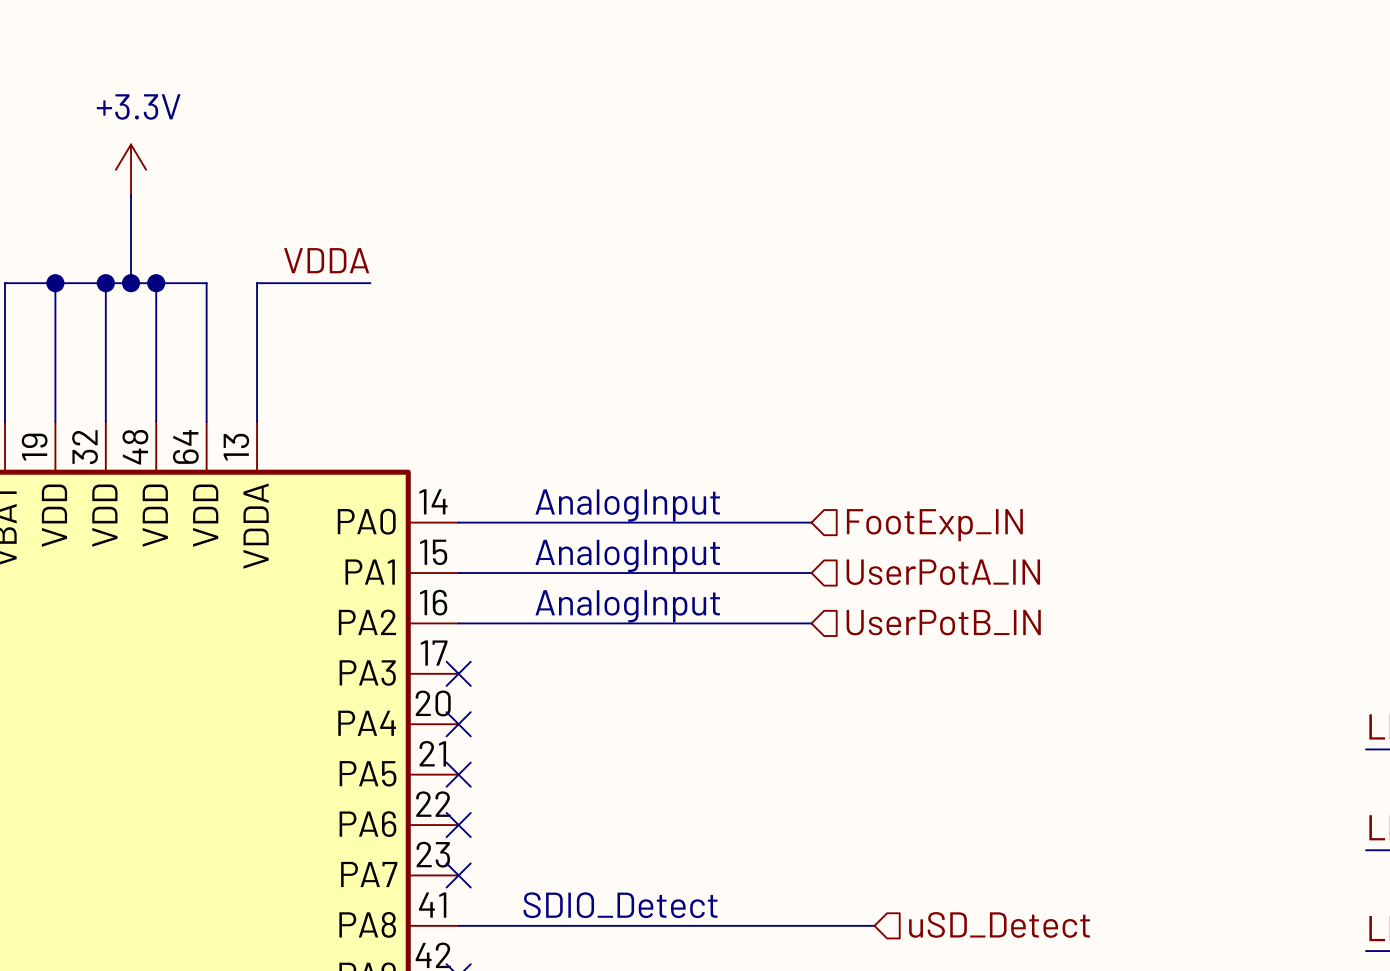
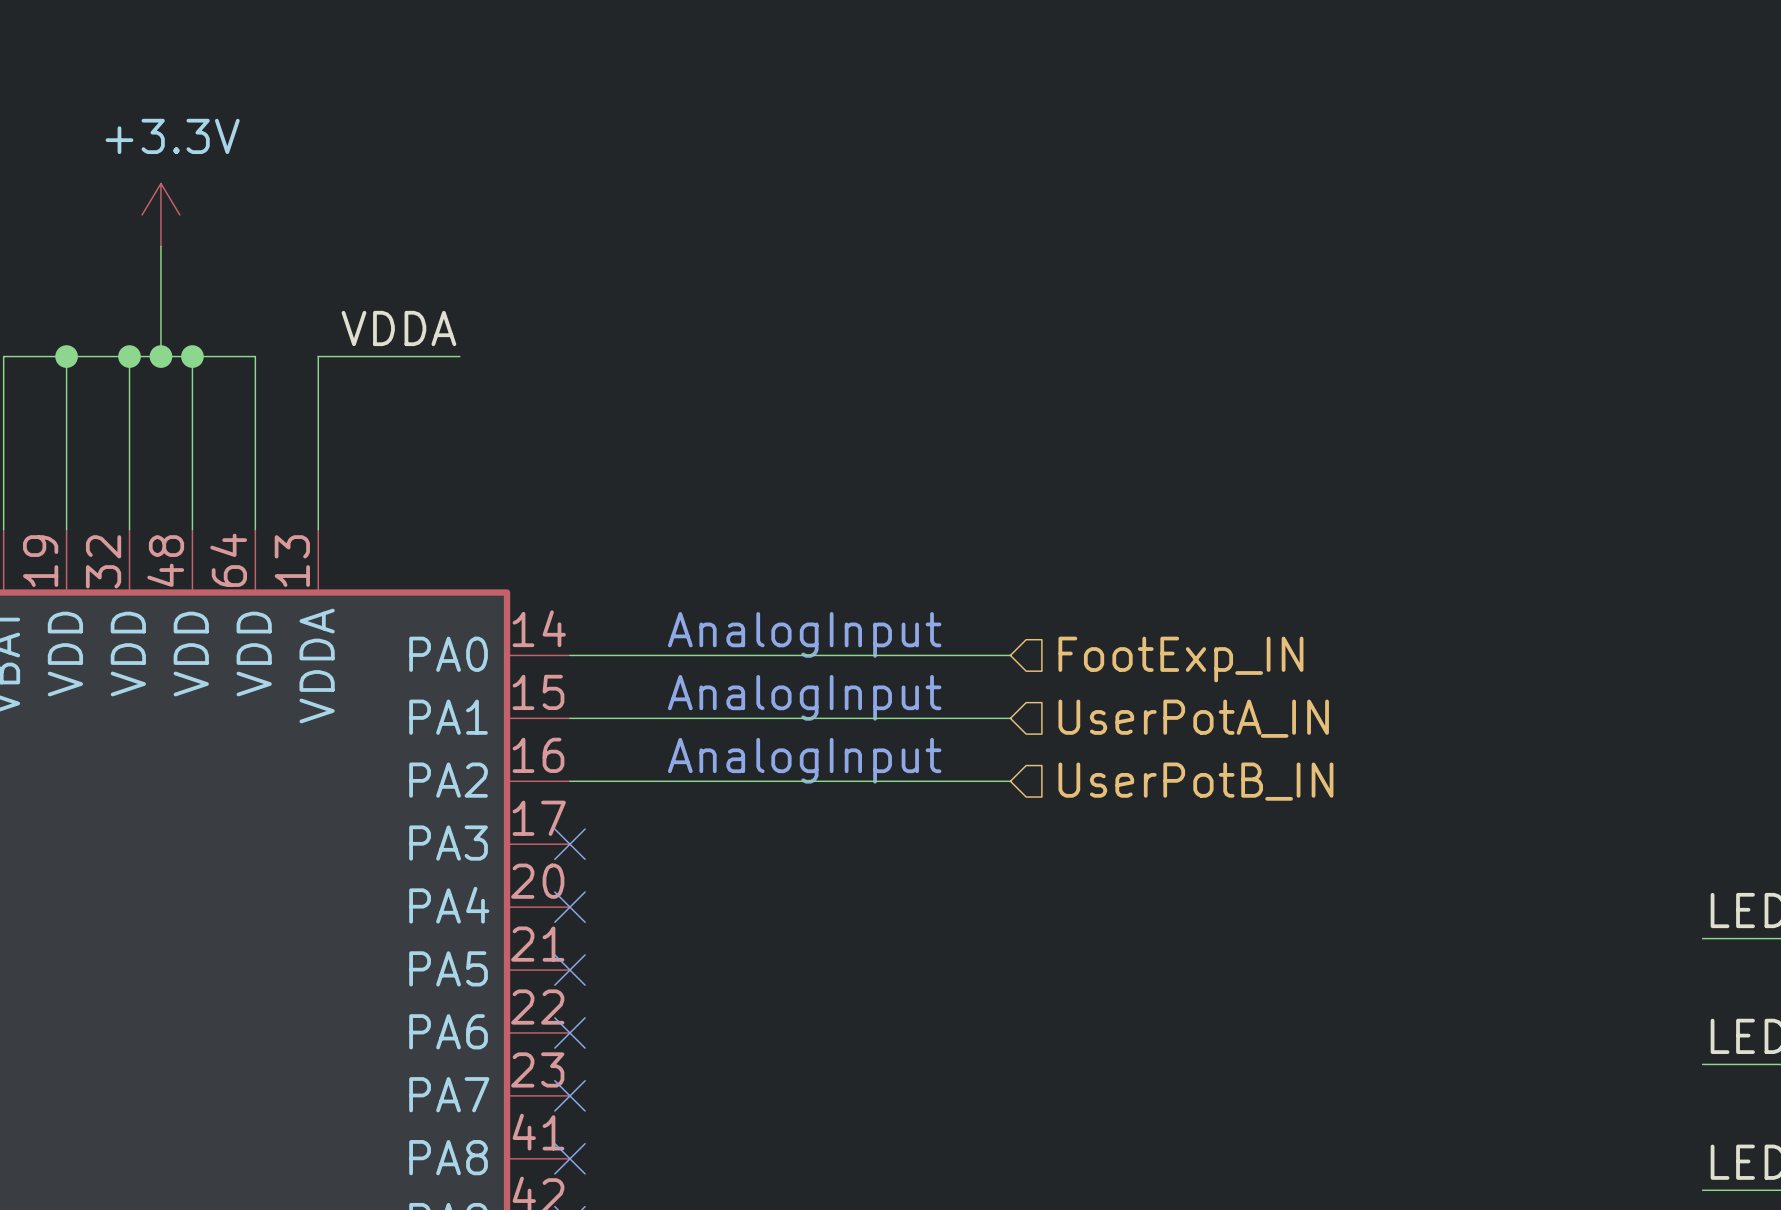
text: SDIO_Detect (620, 905) -> none
hierarchical label: uSD_Detect (999, 924) -> none
wire: (458, 925) (874, 925) -> none
no-connect mark: none -> (569, 1158)

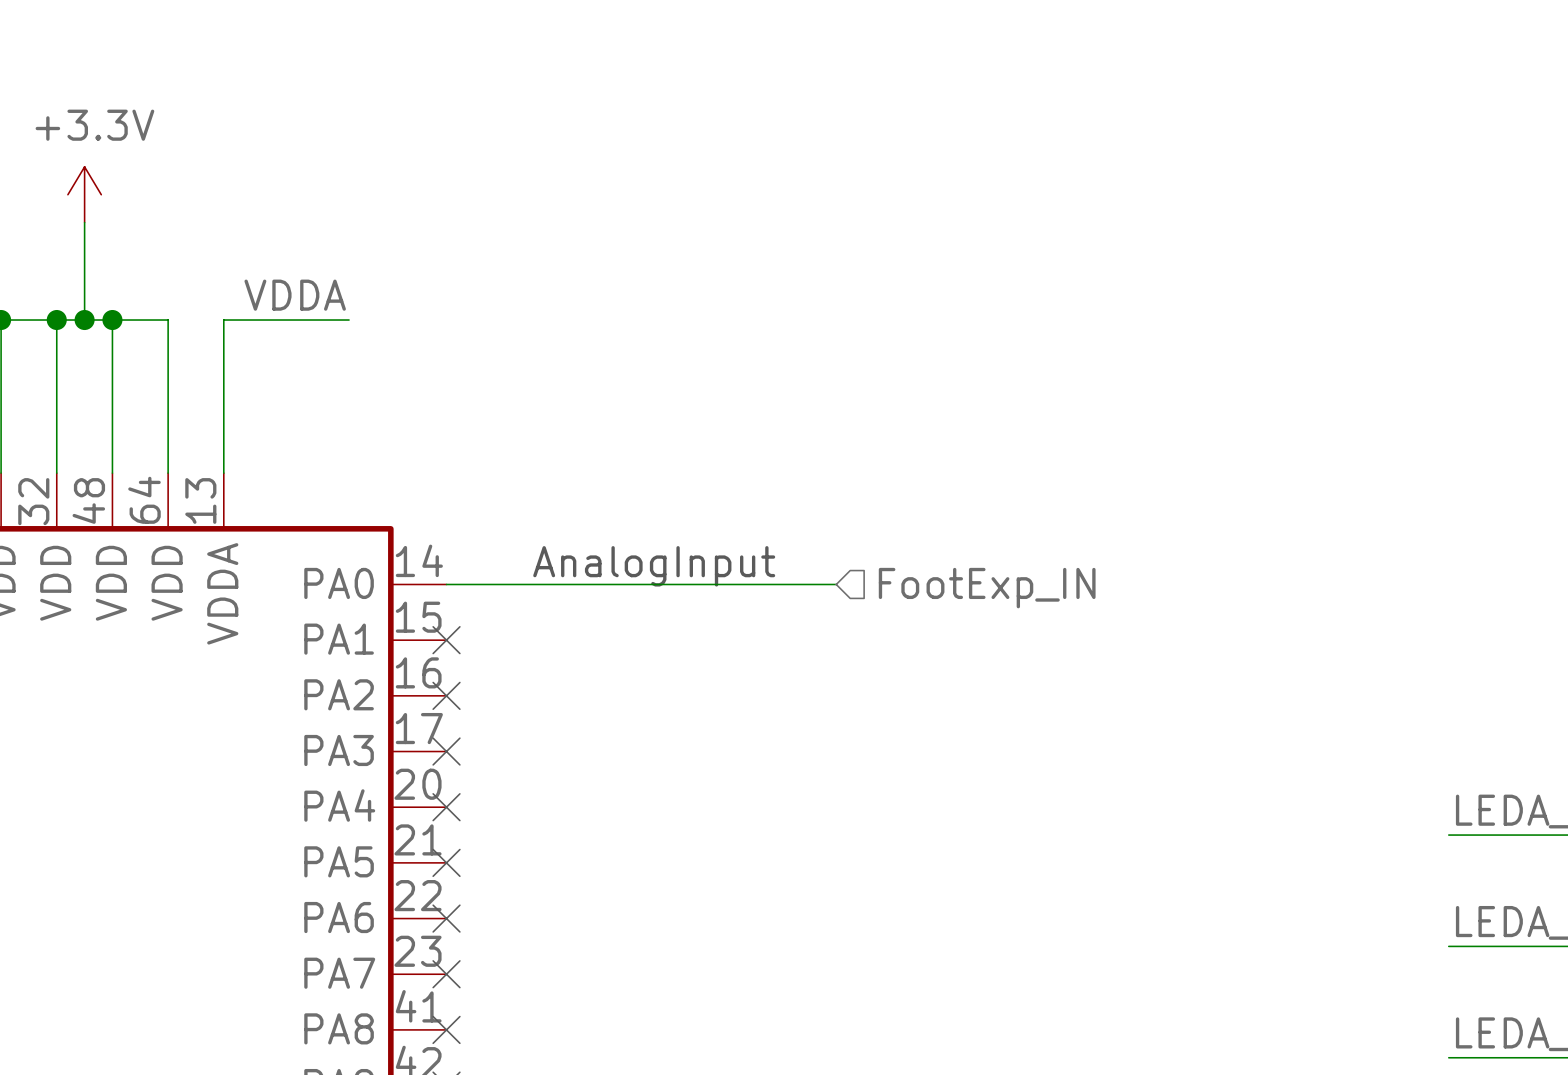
text: AnalogInput (804, 697) -> none
wire: (569, 718) (1010, 718) -> none
no-connect mark: none -> (446, 640)
hierarchical label: UserPotA_IN (1193, 718) -> none
text: AnalogInput (804, 760) -> none
wire: (569, 781) (1010, 781) -> none
no-connect mark: none -> (446, 695)
hierarchical label: UserPotB_IN (1195, 781) -> none

